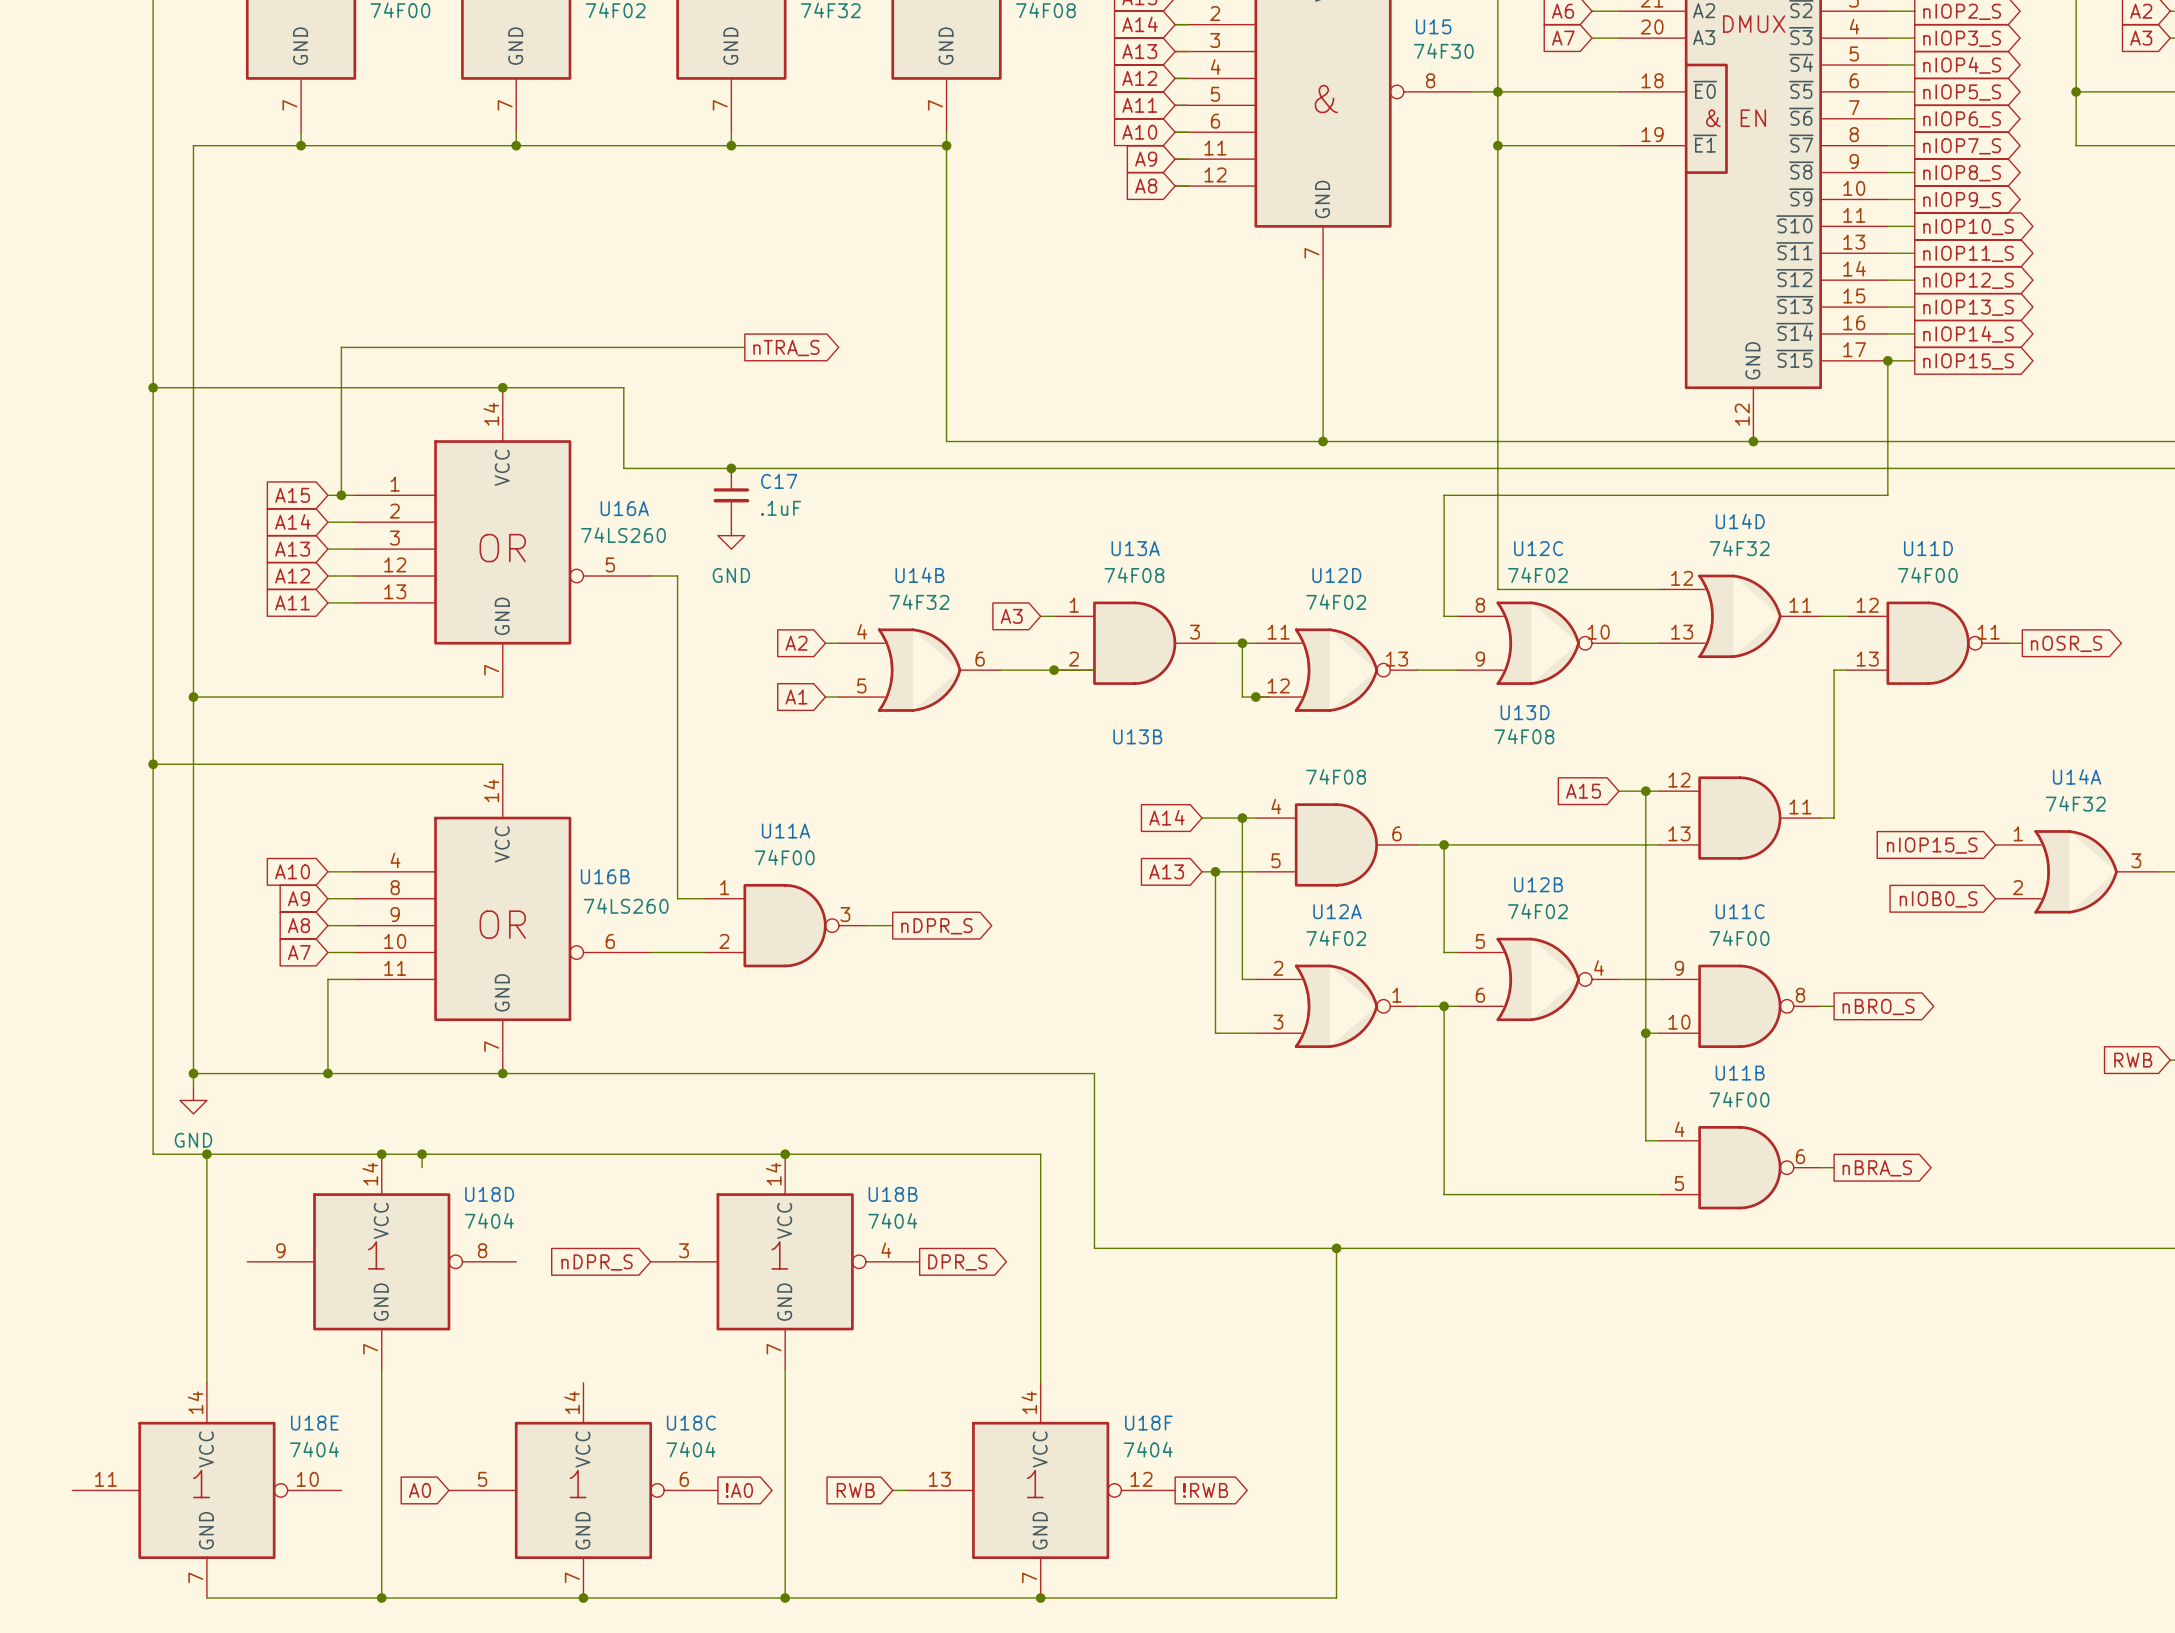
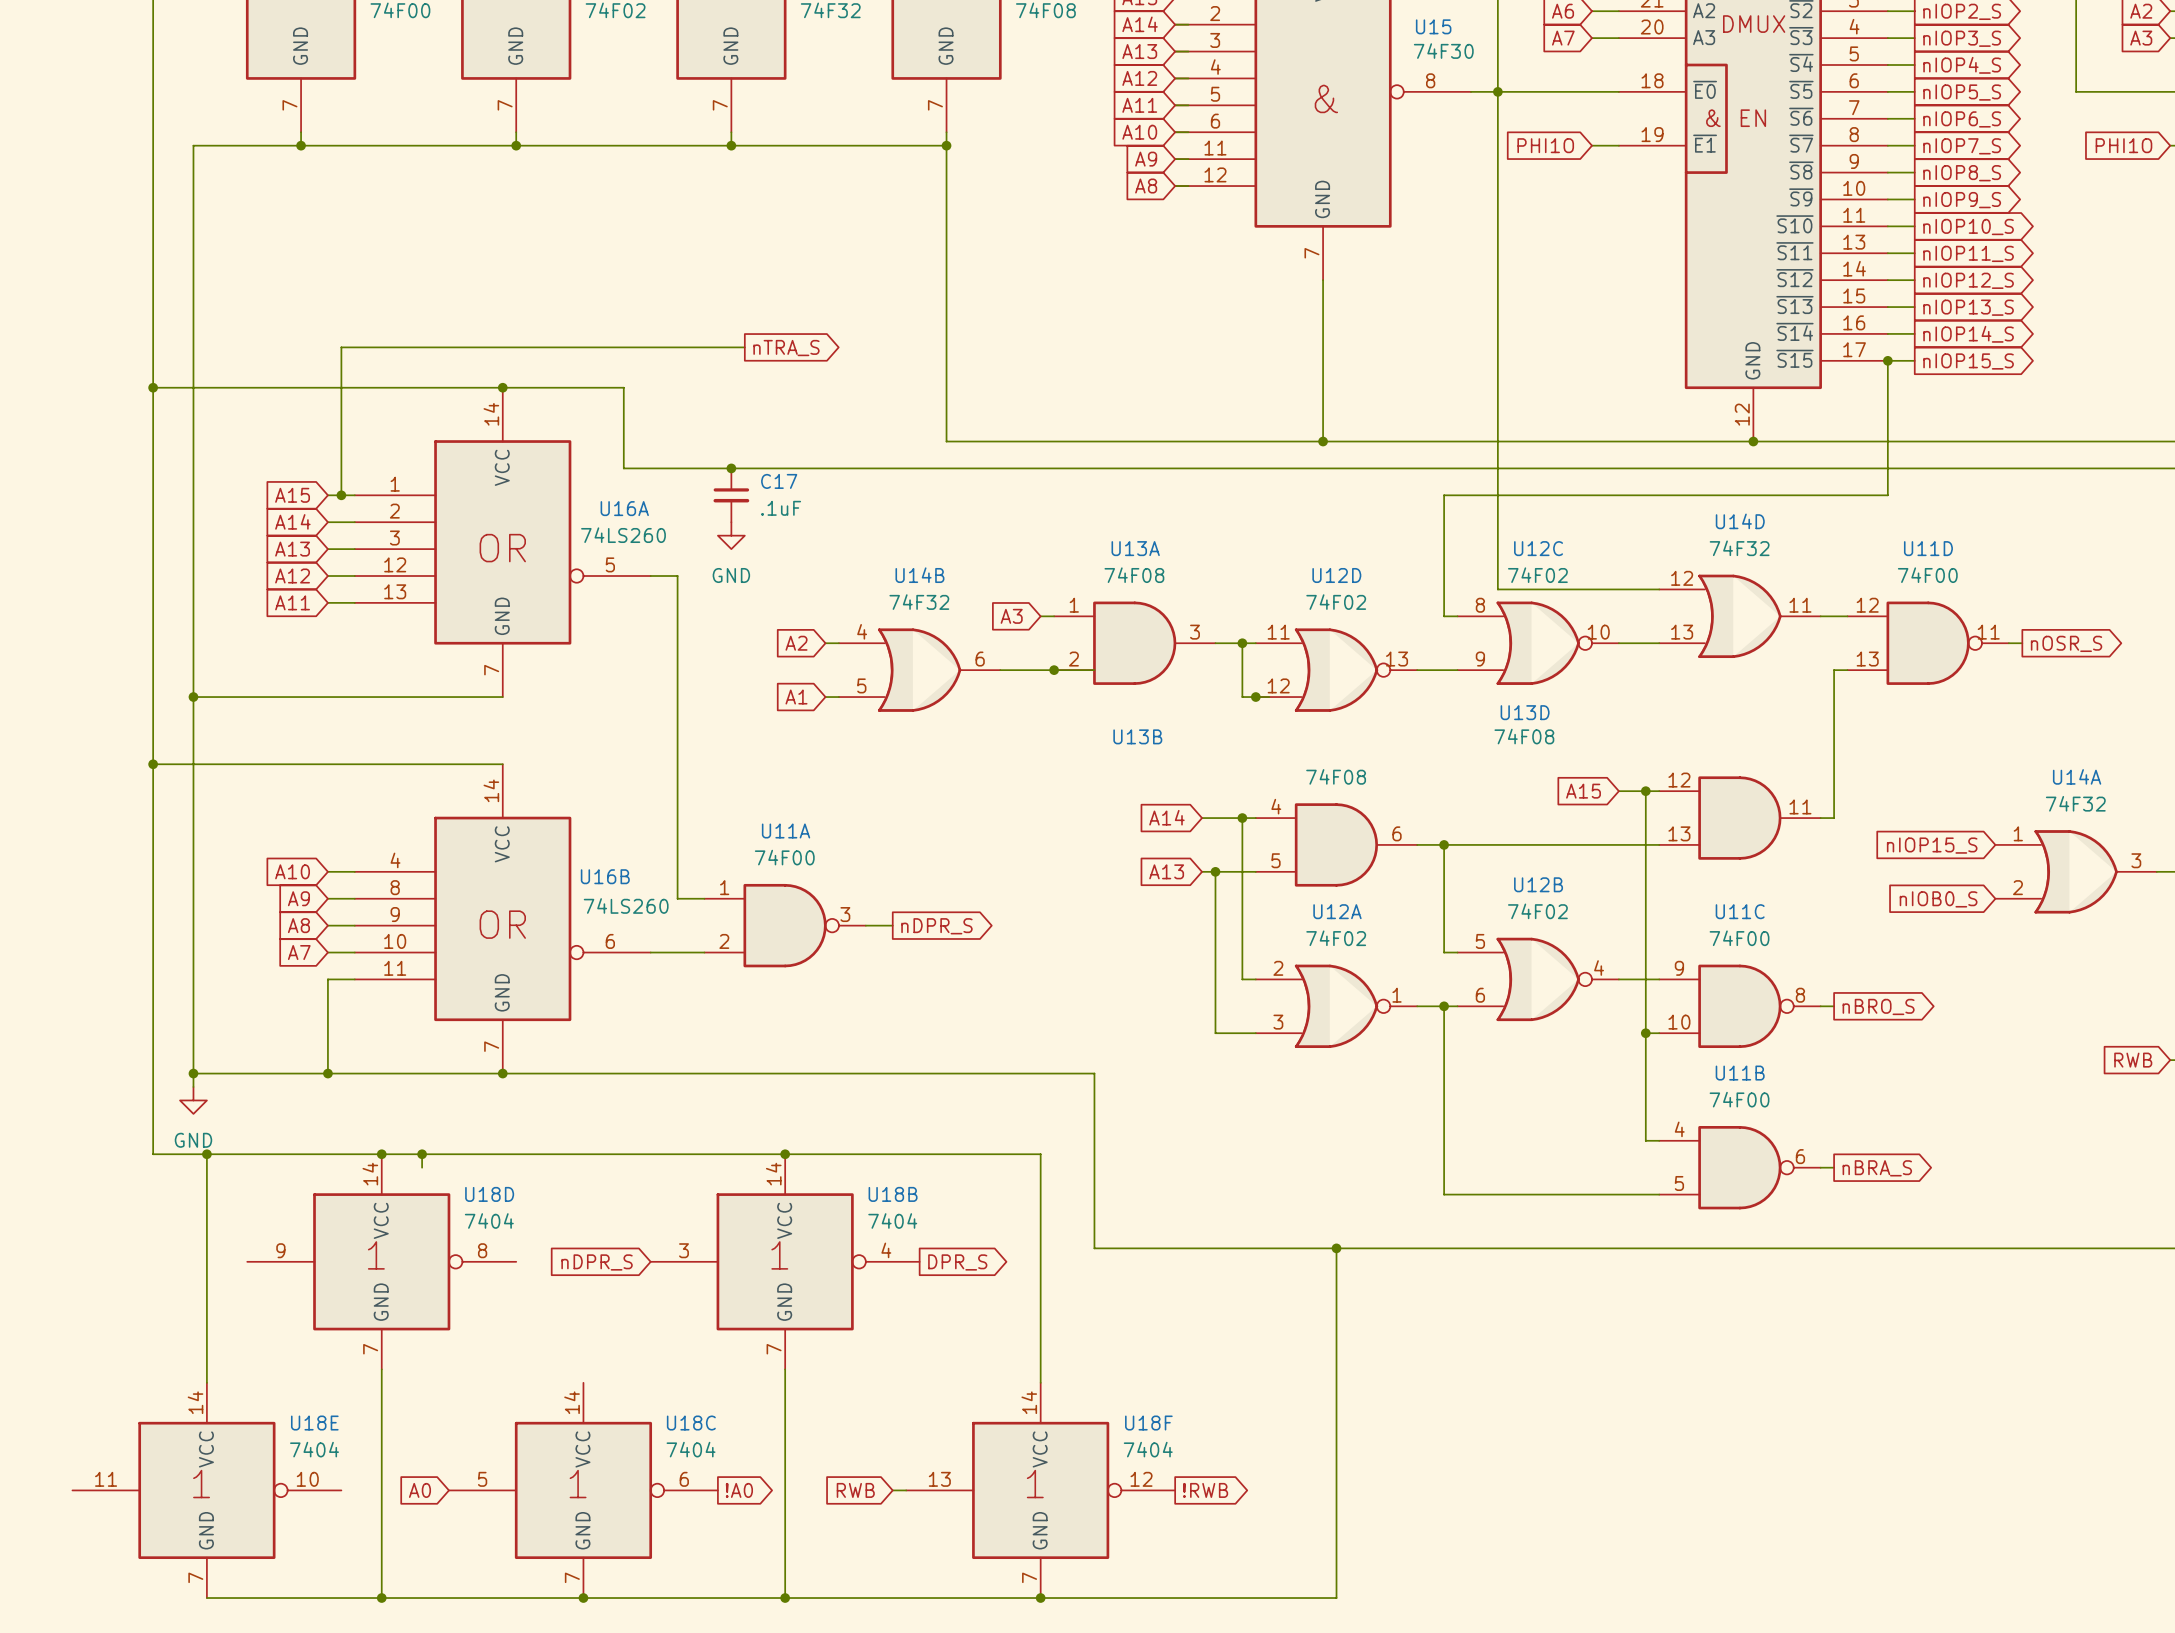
wire: (2076, 91) (2076, 145) (2170, 145) -> none
junction: (2076, 91) -> none
wire: (1497, 145) (1592, 145) -> none
junction: (1497, 145) -> none
global label: none -> PHI1O (1545, 145)
global label: none -> PHI1O (2123, 145)

